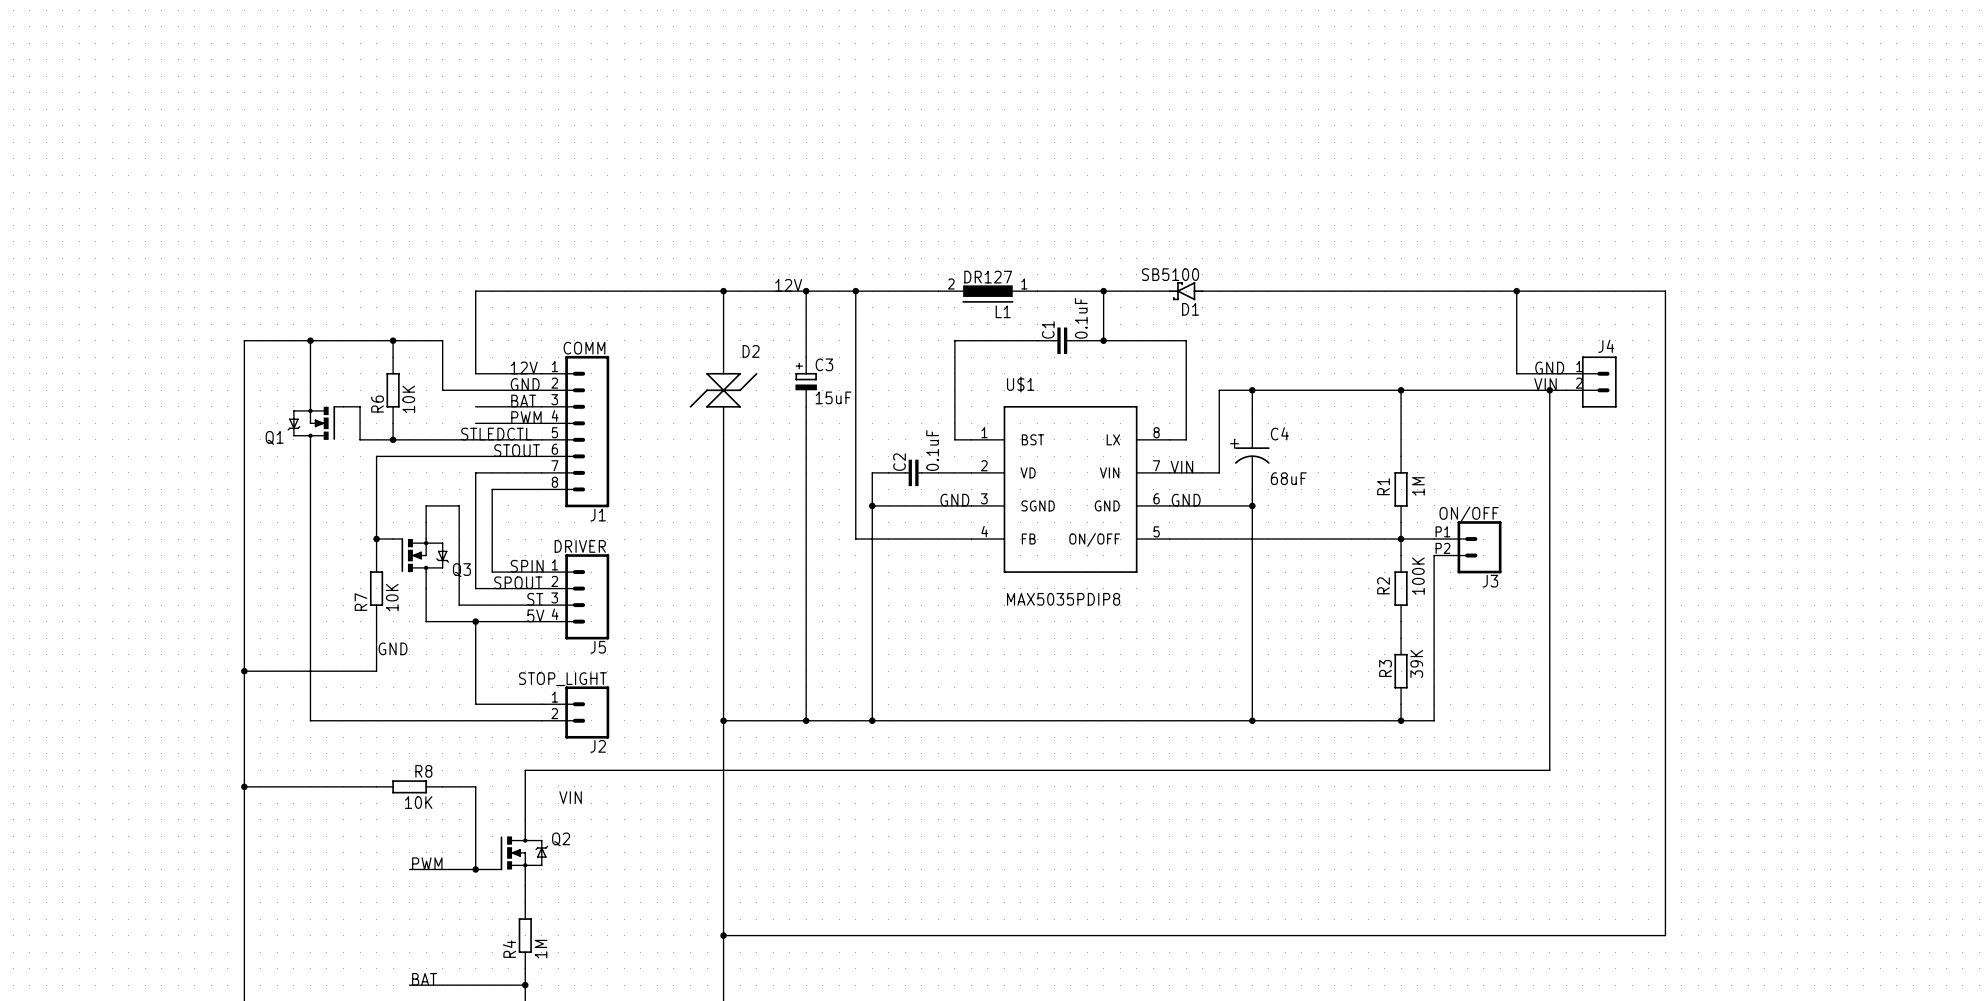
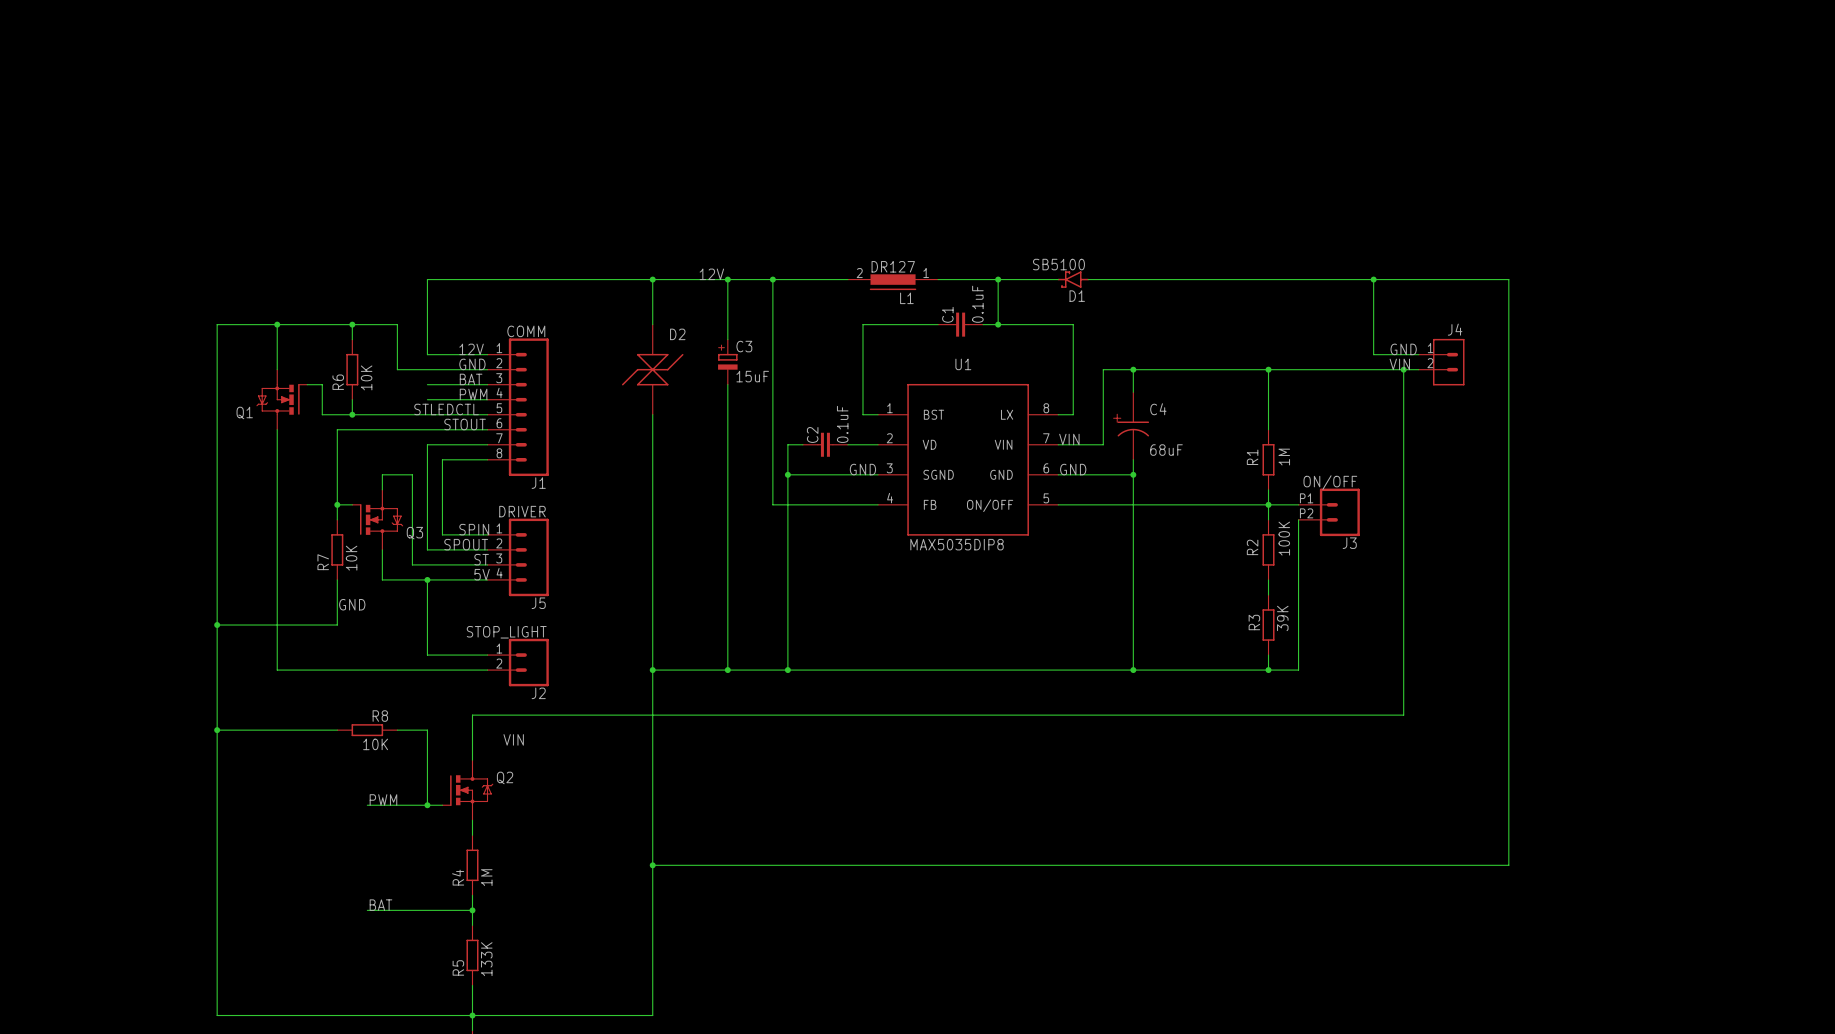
U$1 name: U$1 (1020, 384) -> U1 (963, 364)
U$1 value: MAX5035PDIP8 (1063, 599) -> MAX5035DIP8 (957, 544)

